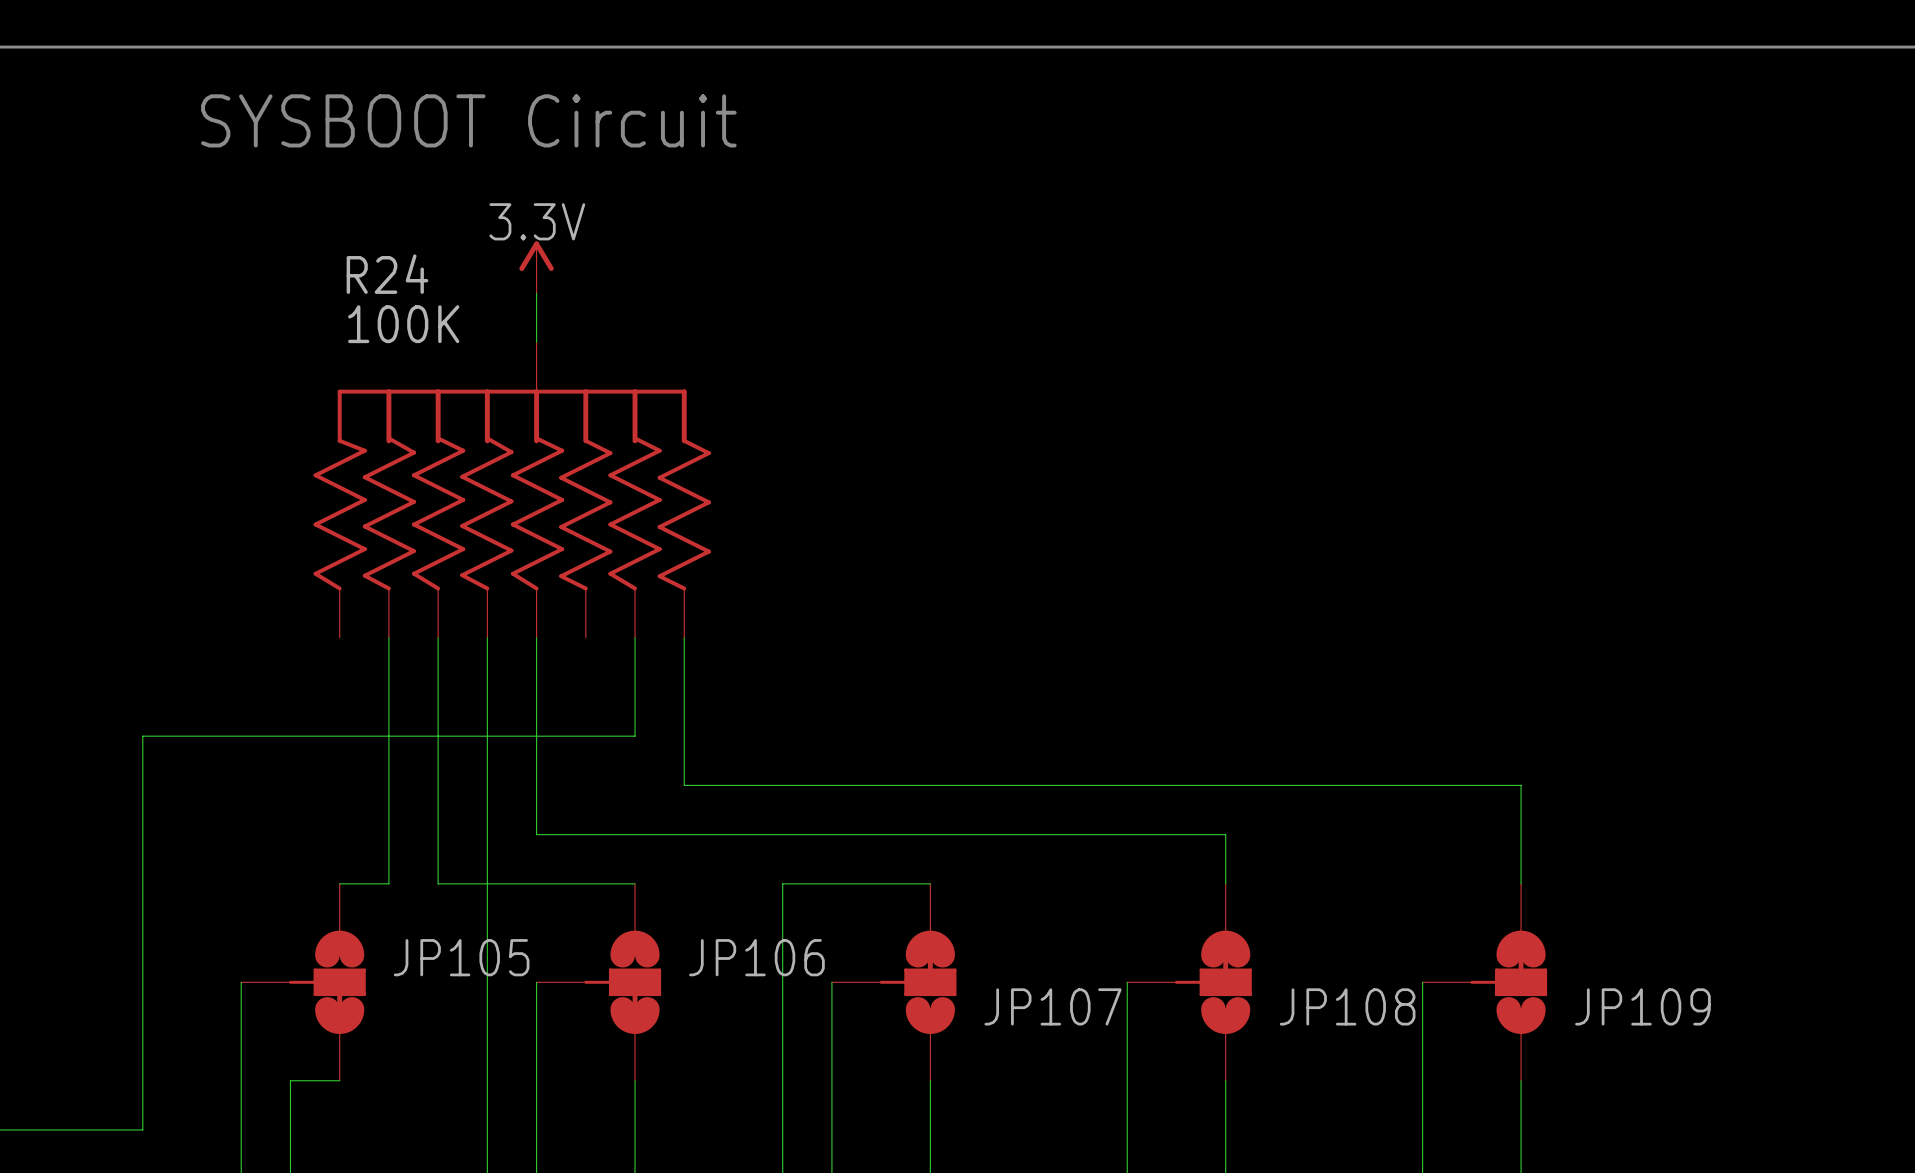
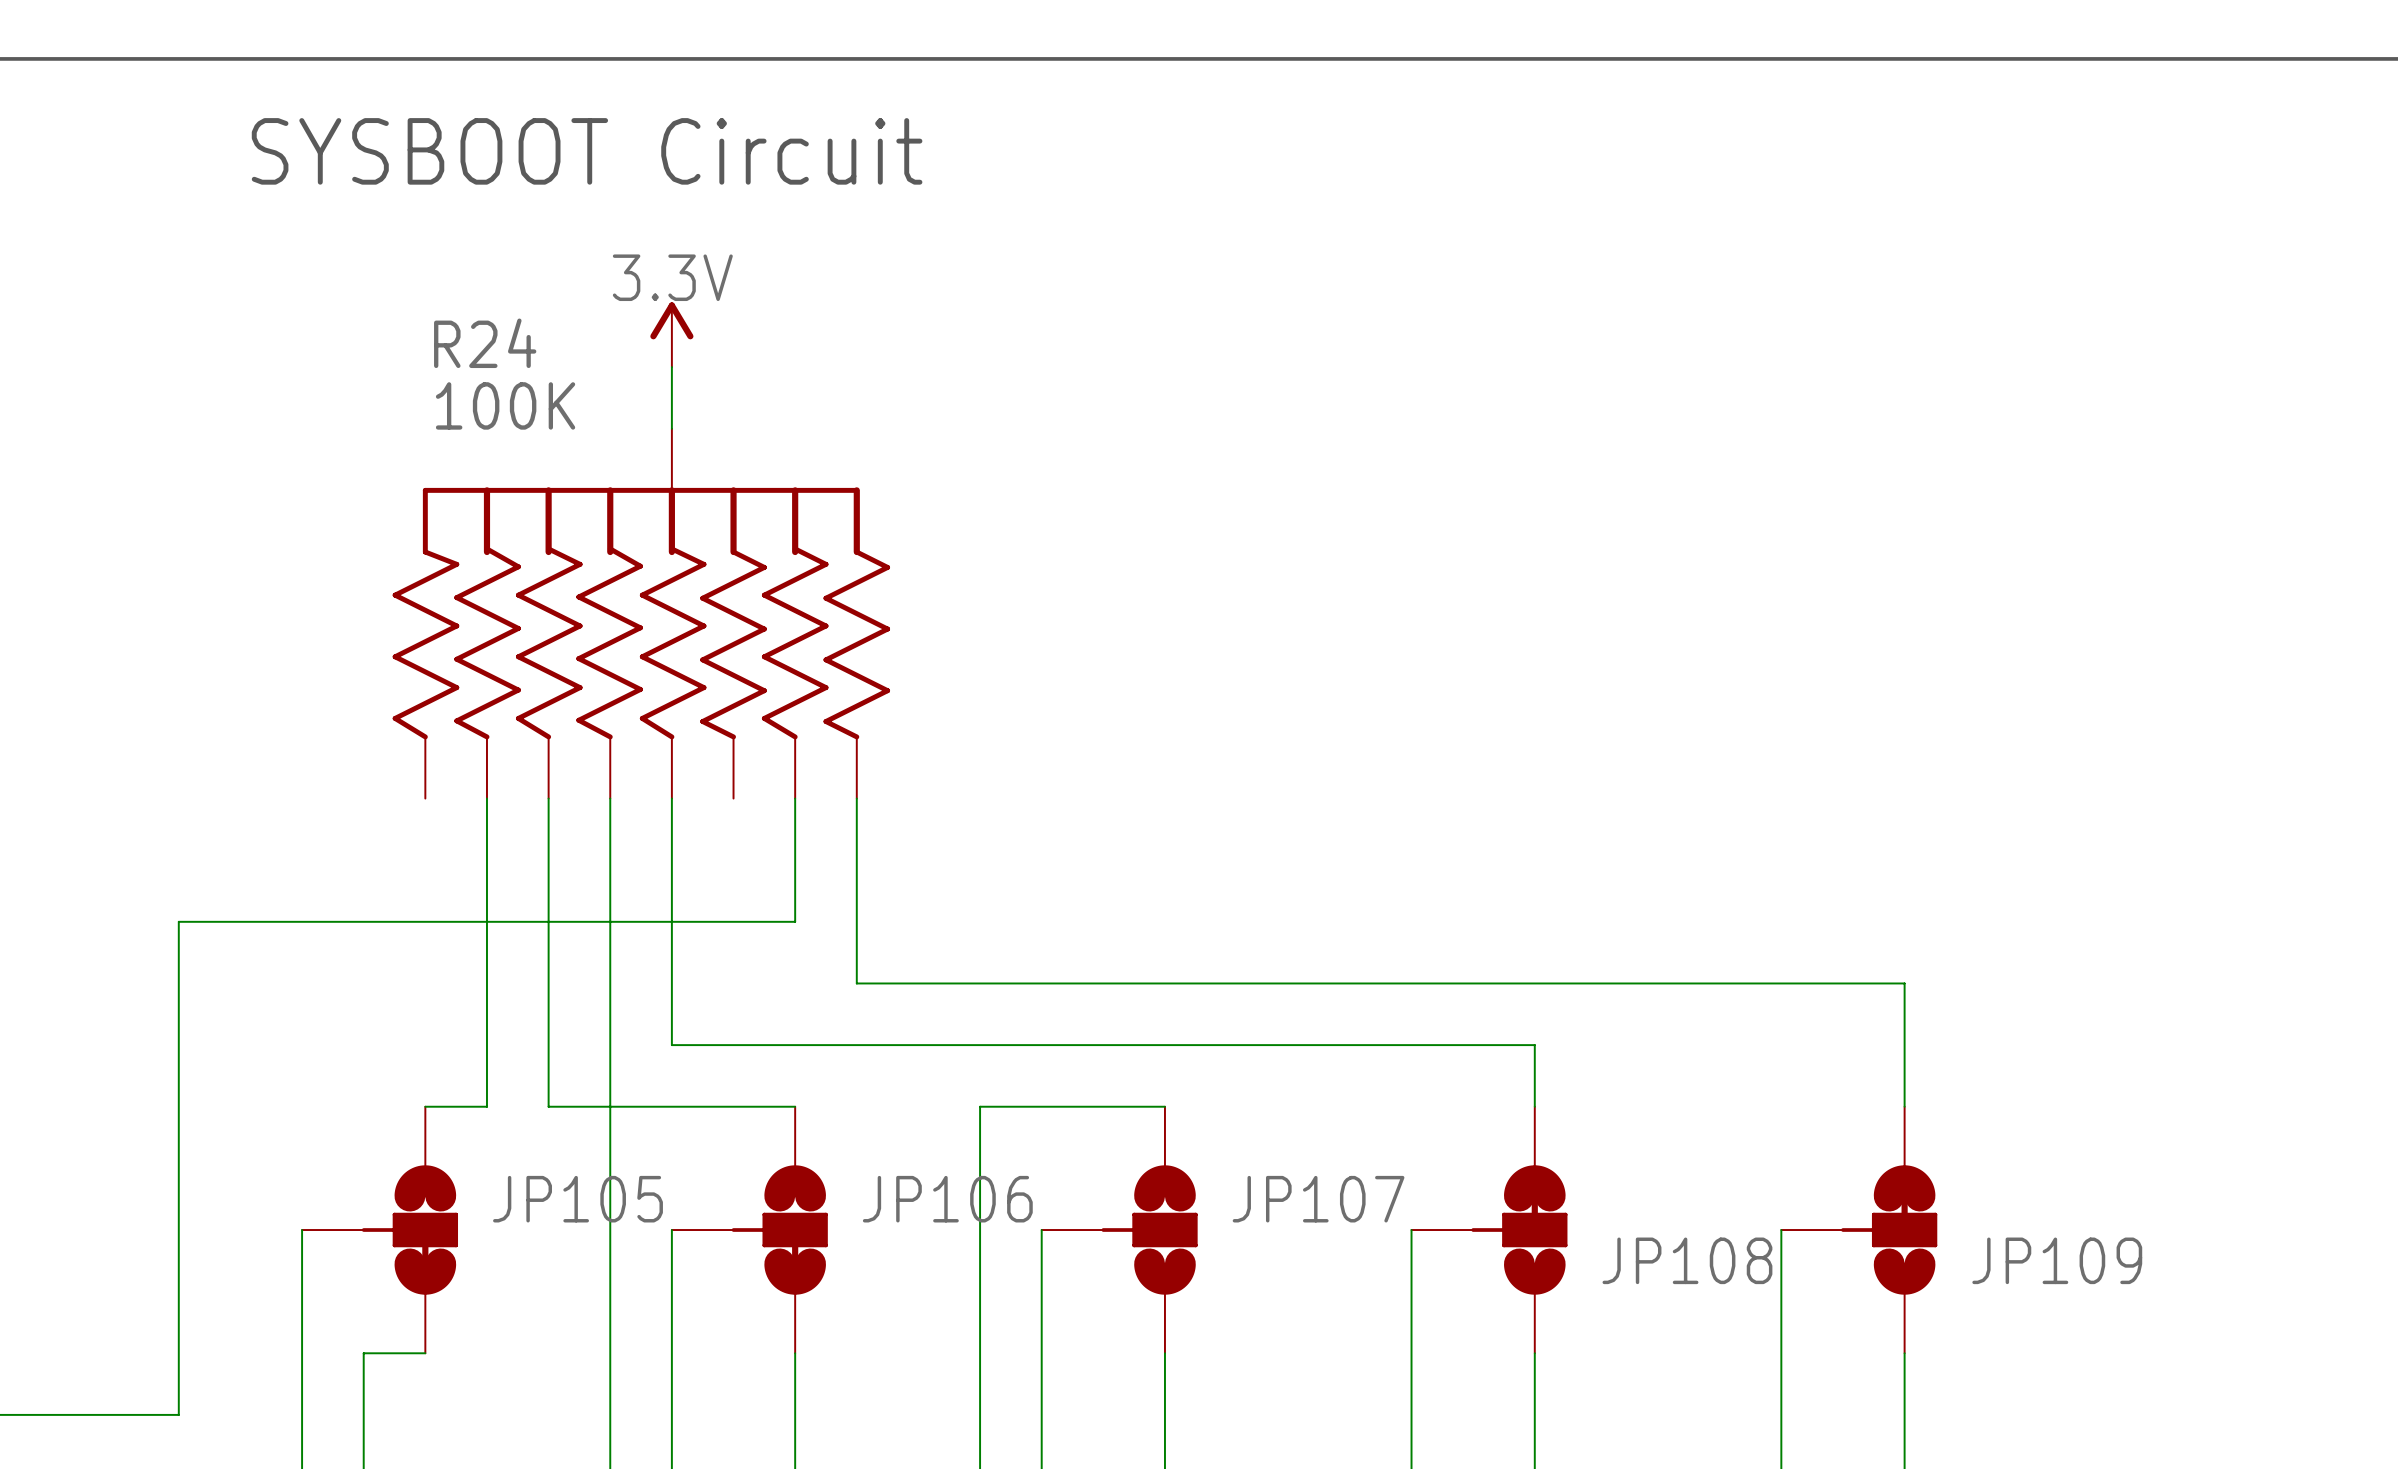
JP107 symbol: [831, 883, 957, 1081] -> [1041, 1106, 1198, 1354]
JP107 name position: JP107 (1053, 1006) -> JP107 (1318, 1199)

